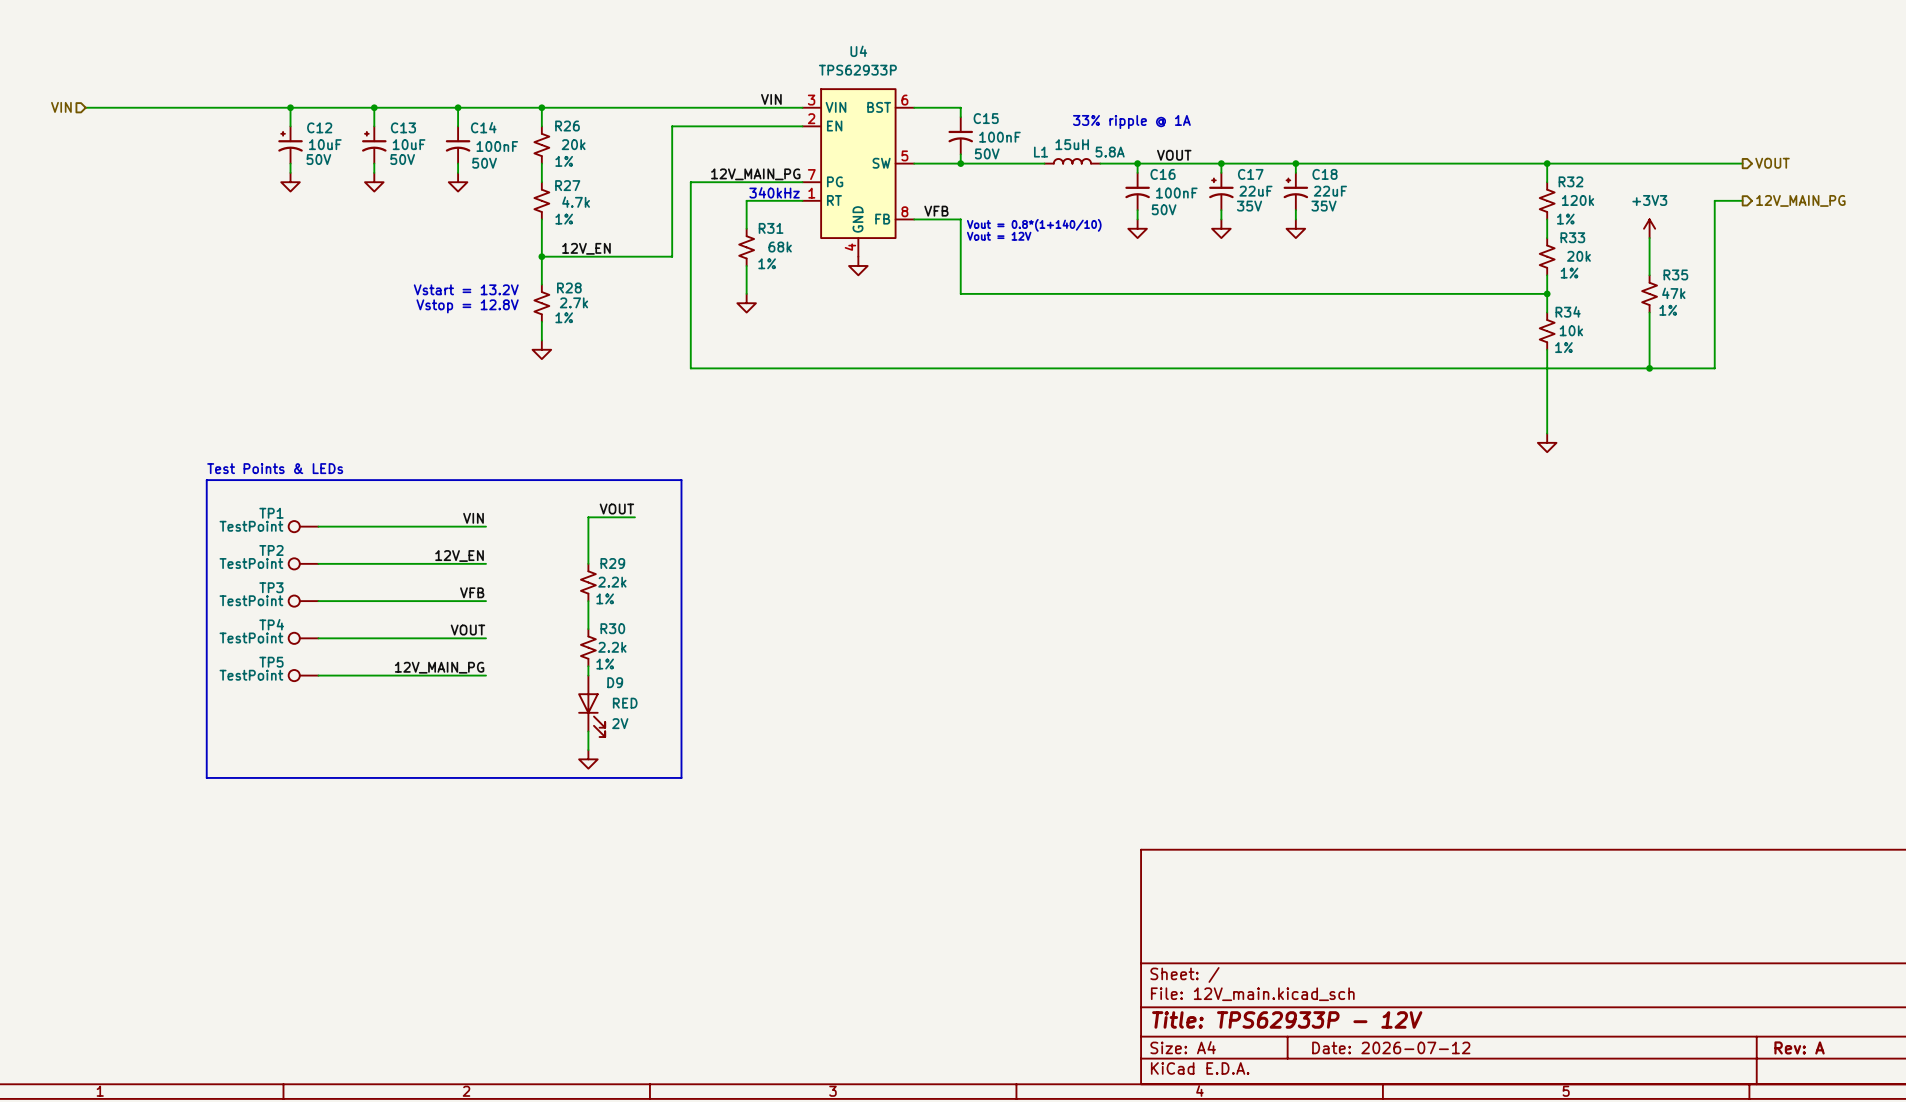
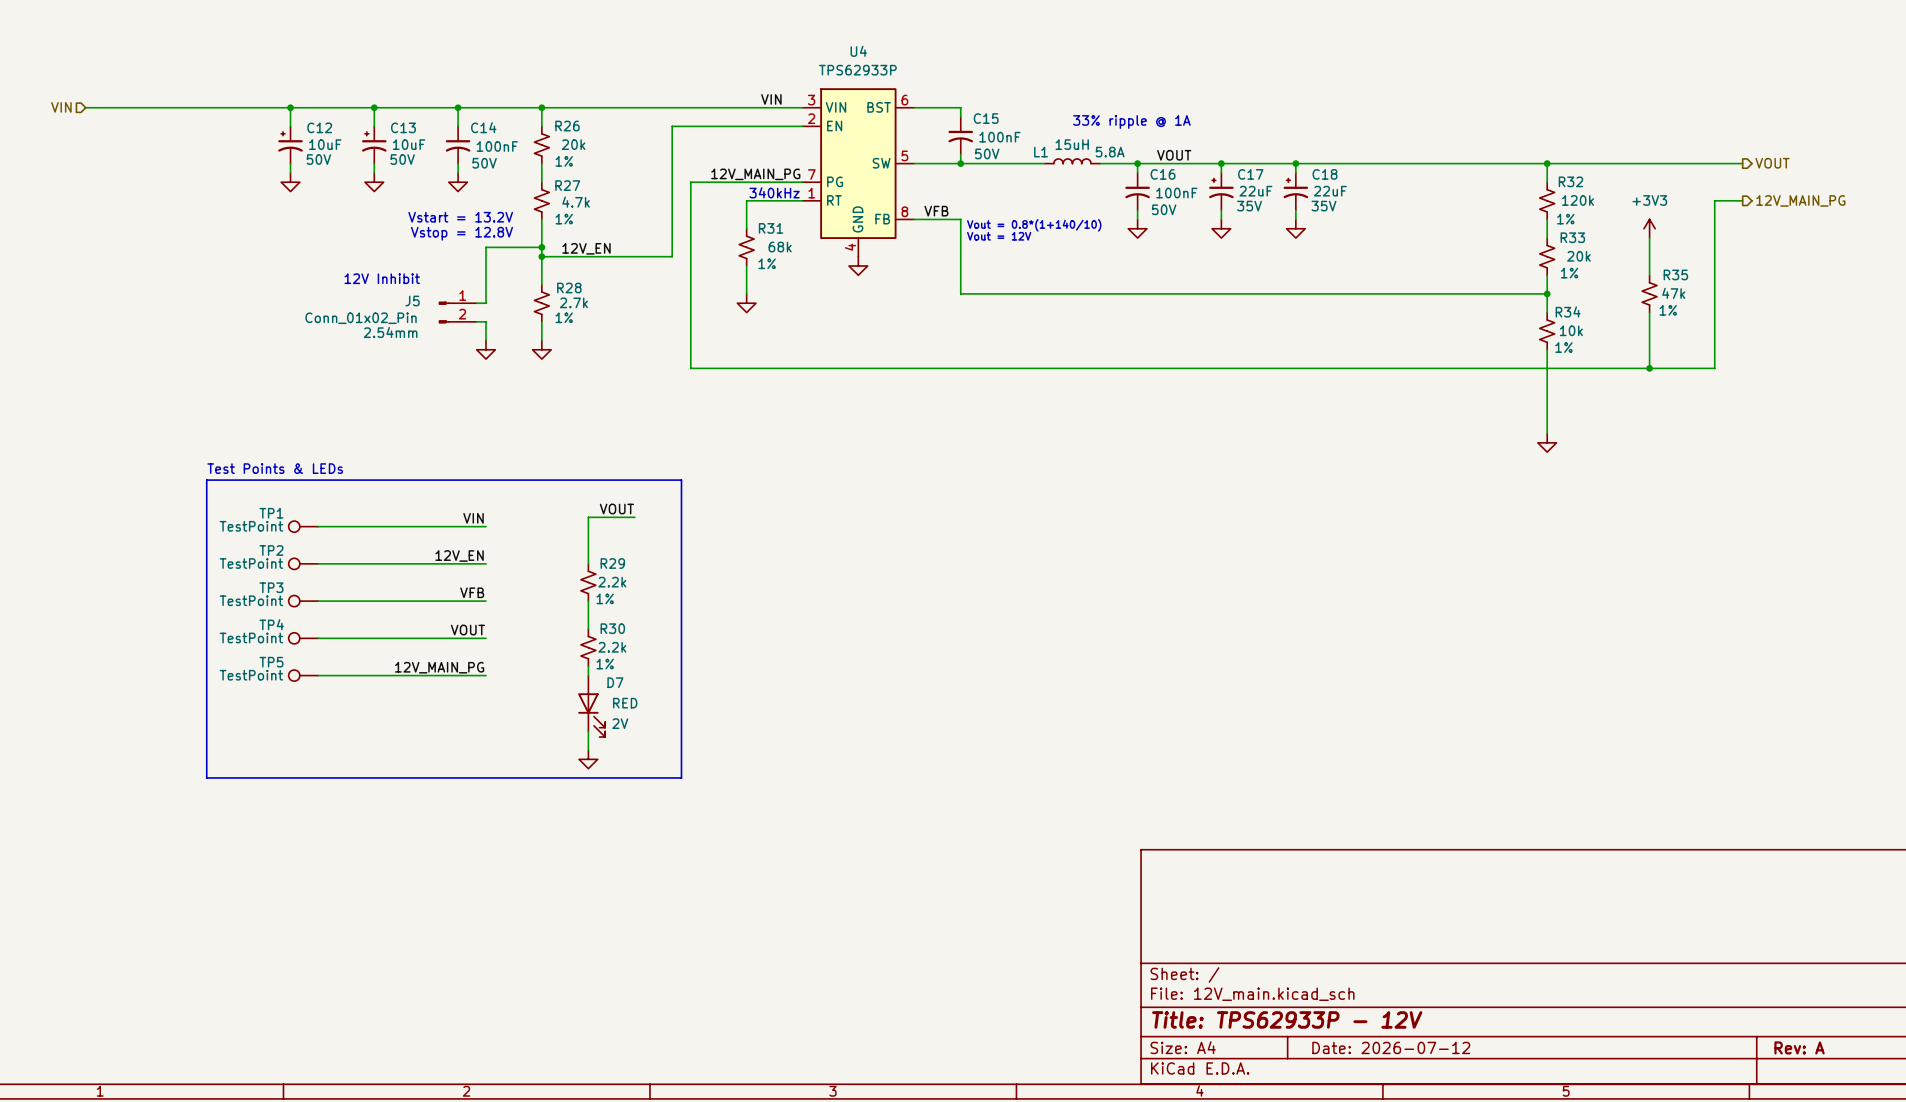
wire: none -> (541, 247) (486, 247) (486, 303) (476, 303)
junction: none -> (541, 247)
text: none -> 12V Inhibit (382, 278)
text position: Vstart = 13.2V (466, 289) -> Vstart = 13.2V (460, 217)
text position: Vstop = 12.8V (467, 306) -> Vstop = 12.8V (461, 233)
J5: none -> Conn_01x02_Pin (457, 312)
wire: none -> (476, 321) (486, 321) (486, 340)
power symbol: none -> (486, 349)
D9 name: D9 (615, 682) -> D7 (615, 682)

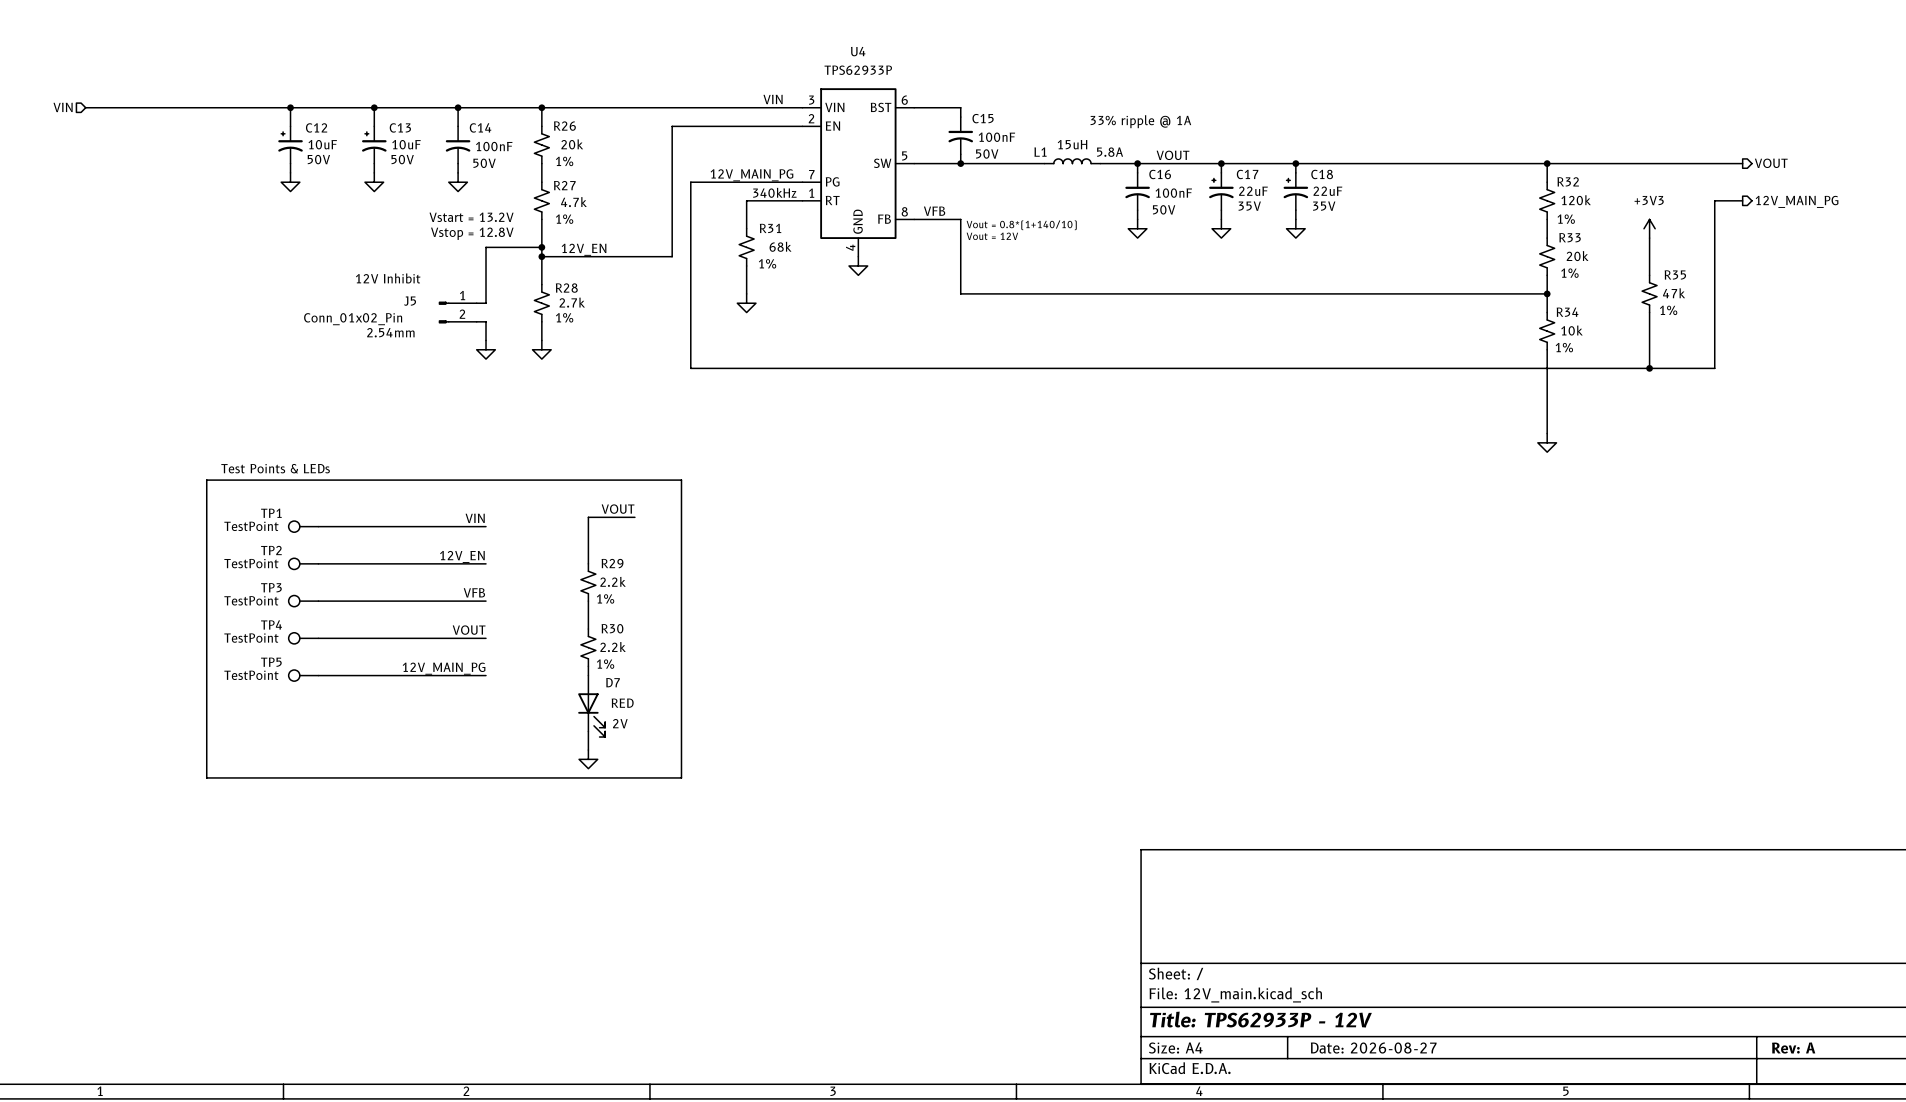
title block: Date: 2026-07-12 (1391, 1047) -> Date: 2026-08-27 (1373, 1048)

